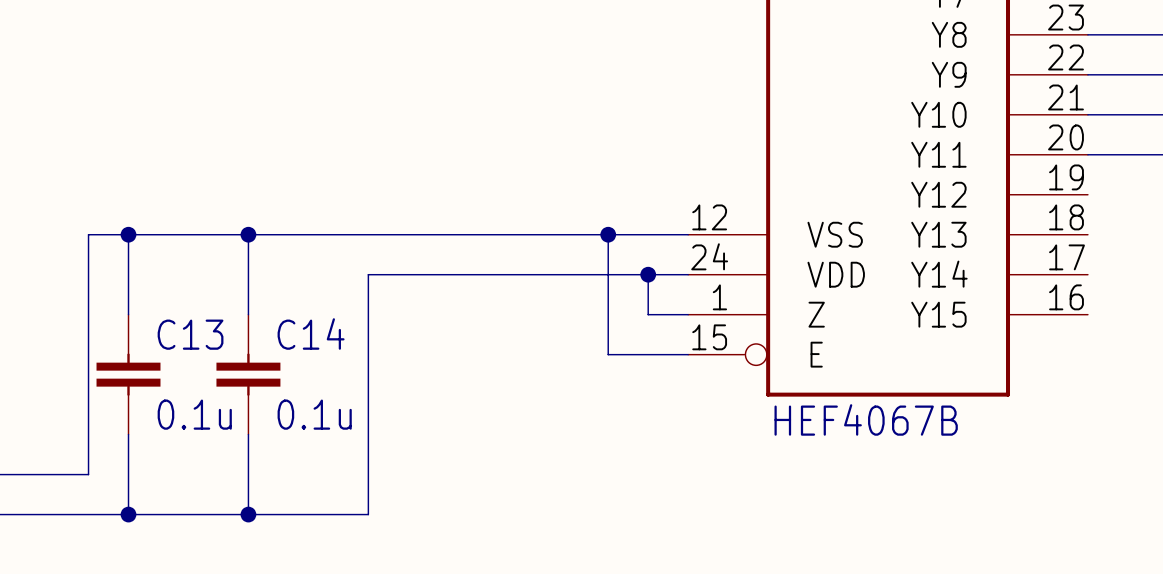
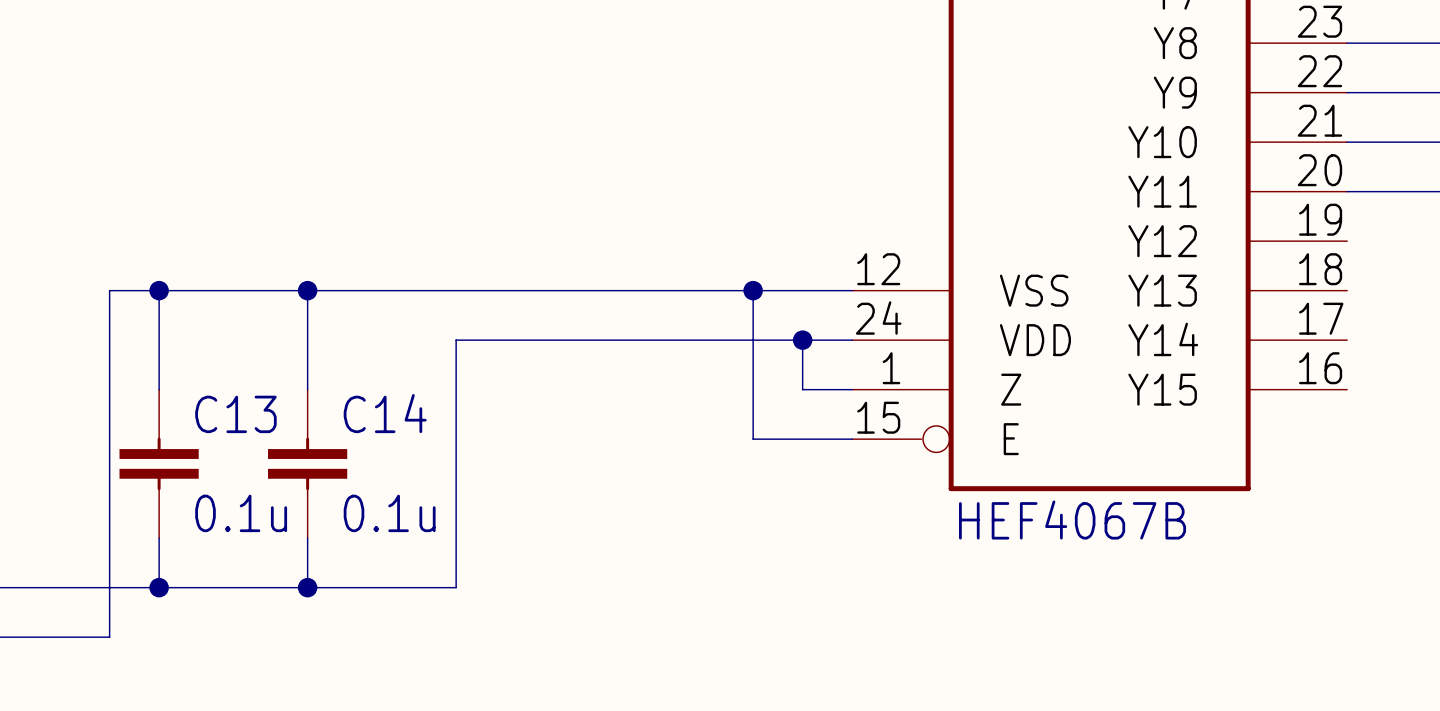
wire: (128, 474) (128, 514) -> none
wire: (248, 474) (248, 514) -> none
wire: (368, 474) (368, 514) (88, 514) -> (456, 587) (109, 587) (109, 637)
junction position: (128, 514) -> (159, 587)
junction position: (248, 514) -> (307, 587)

